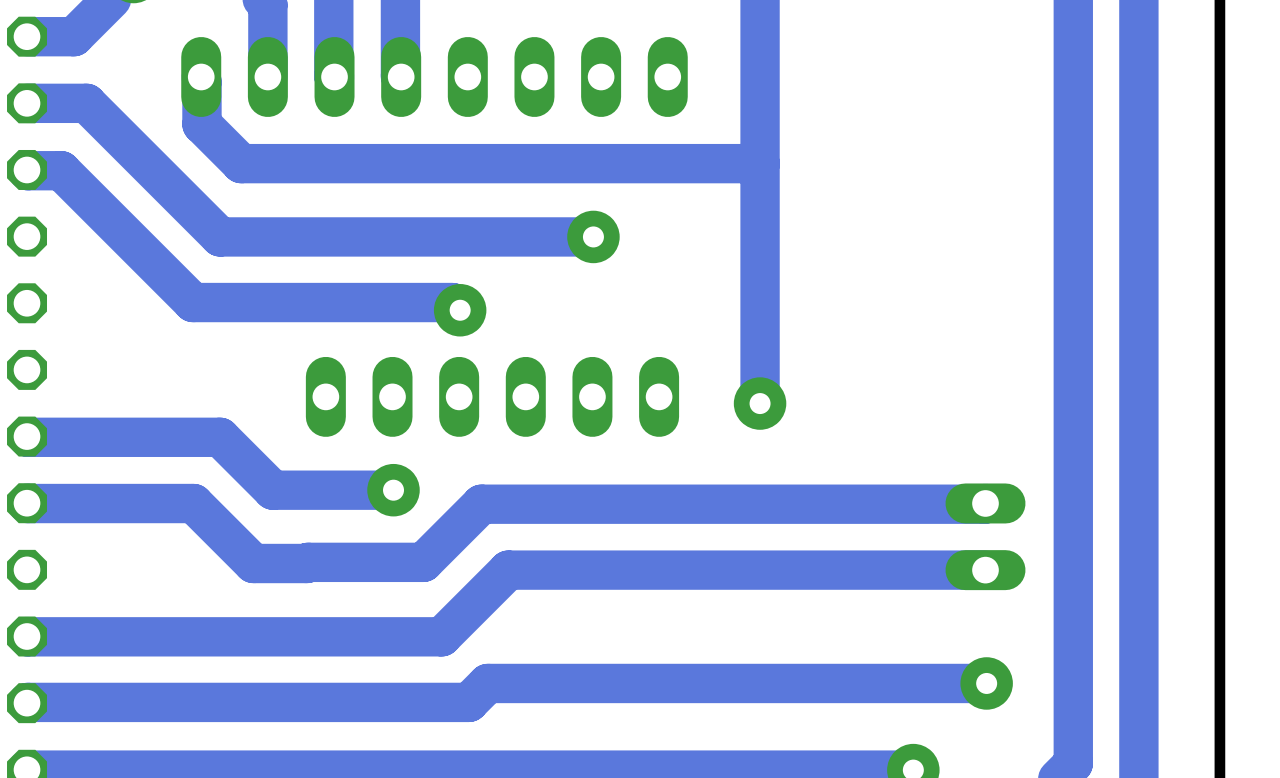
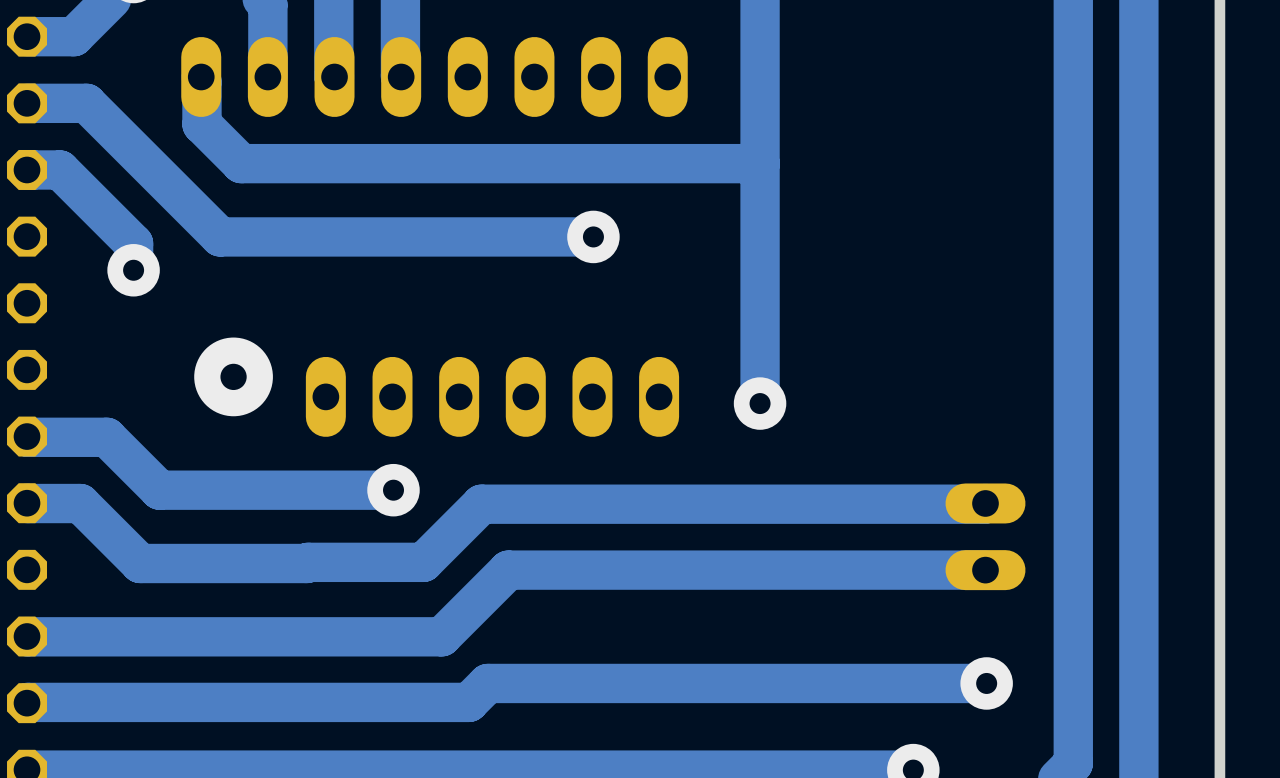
track: (27, 169) (61, 170) (193, 302) (452, 302) (460, 310) -> (27, 169) (59, 169) (133, 243) (133, 270)
via: none -> (133, 270)
via: (460, 310) -> none
via: none -> (233, 376)
track: (106, 437) (220, 437) (273, 490) -> (106, 437) (159, 490) (273, 490)
track: (80, 503) (193, 503) (253, 563) -> (80, 503) (140, 563) (253, 563)

